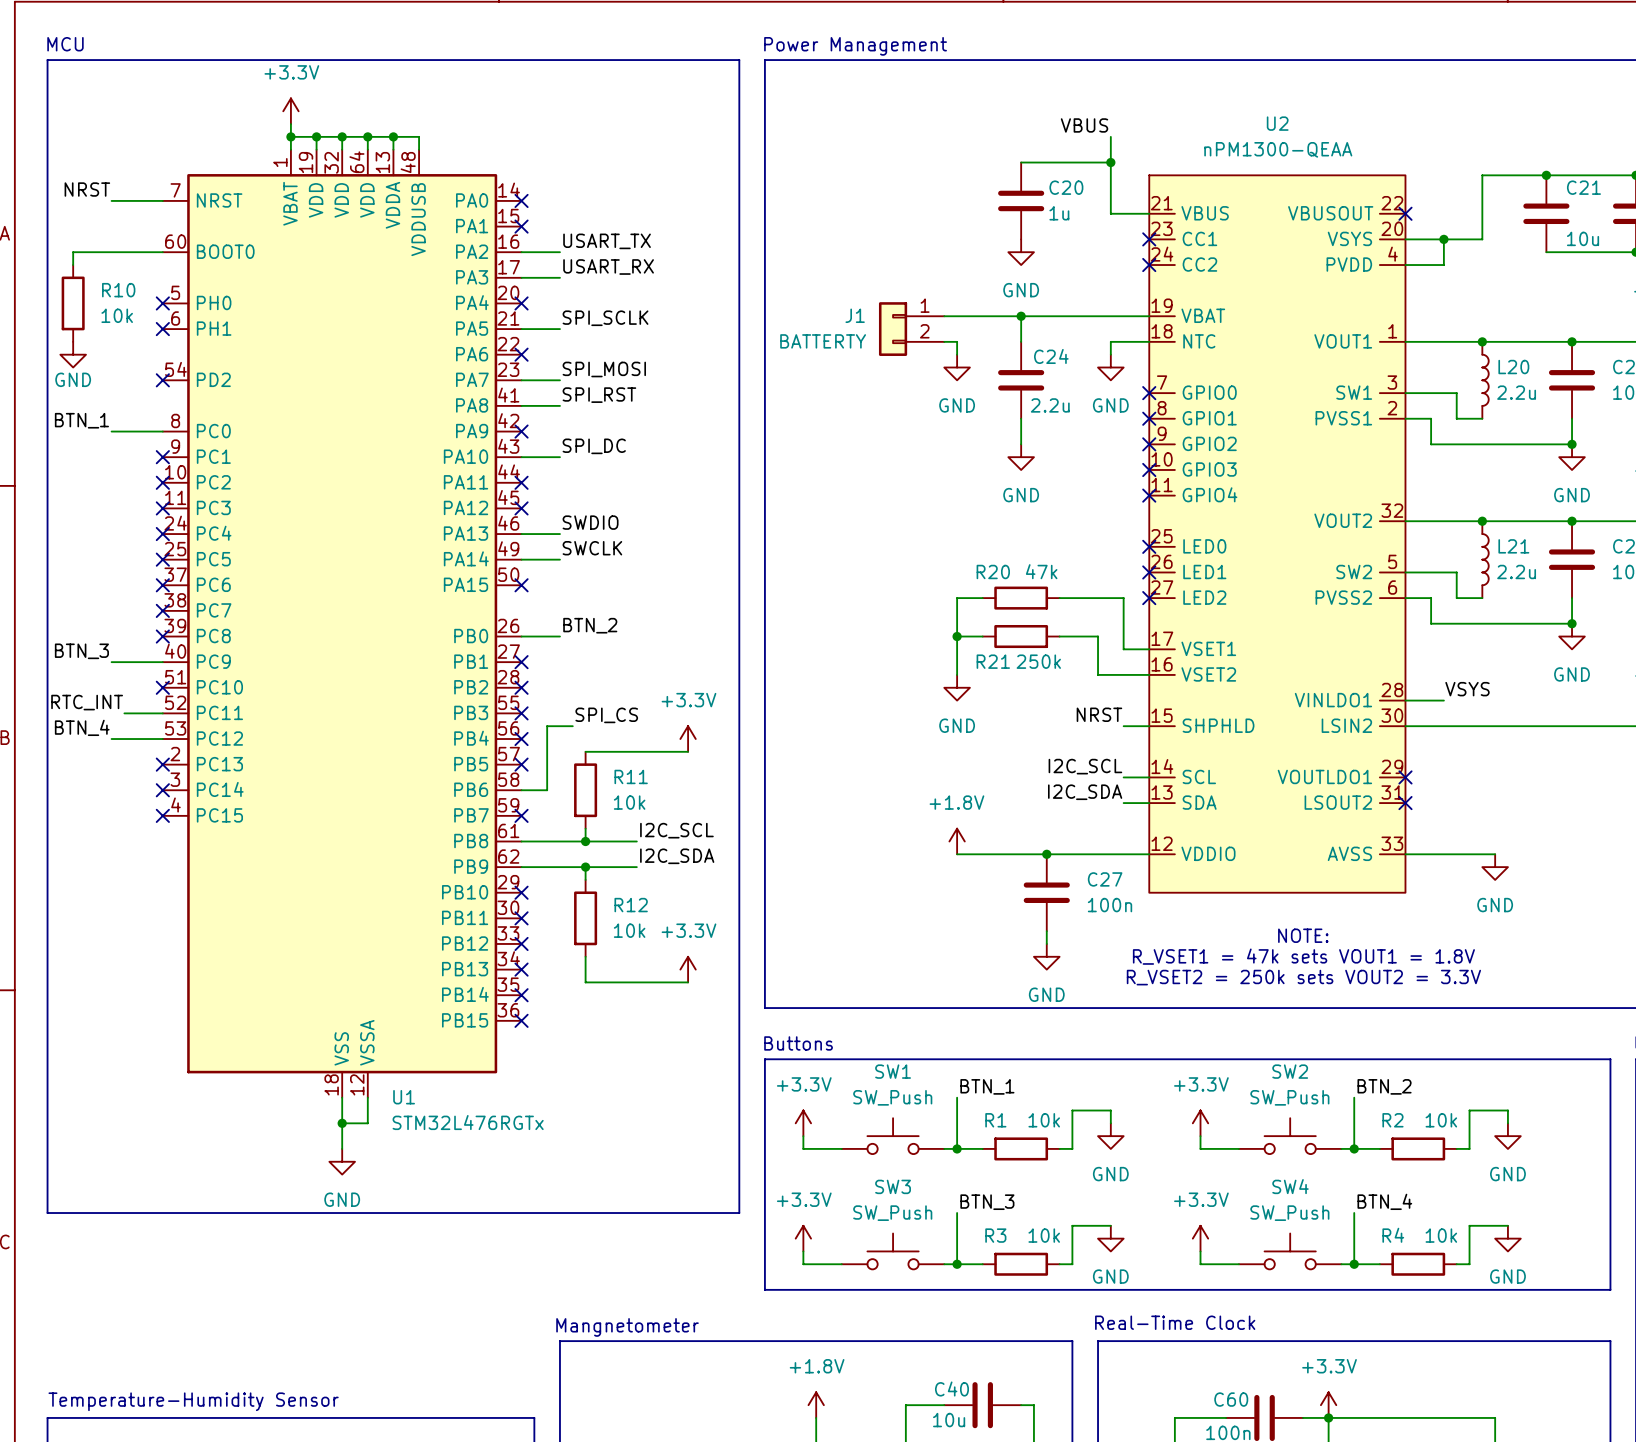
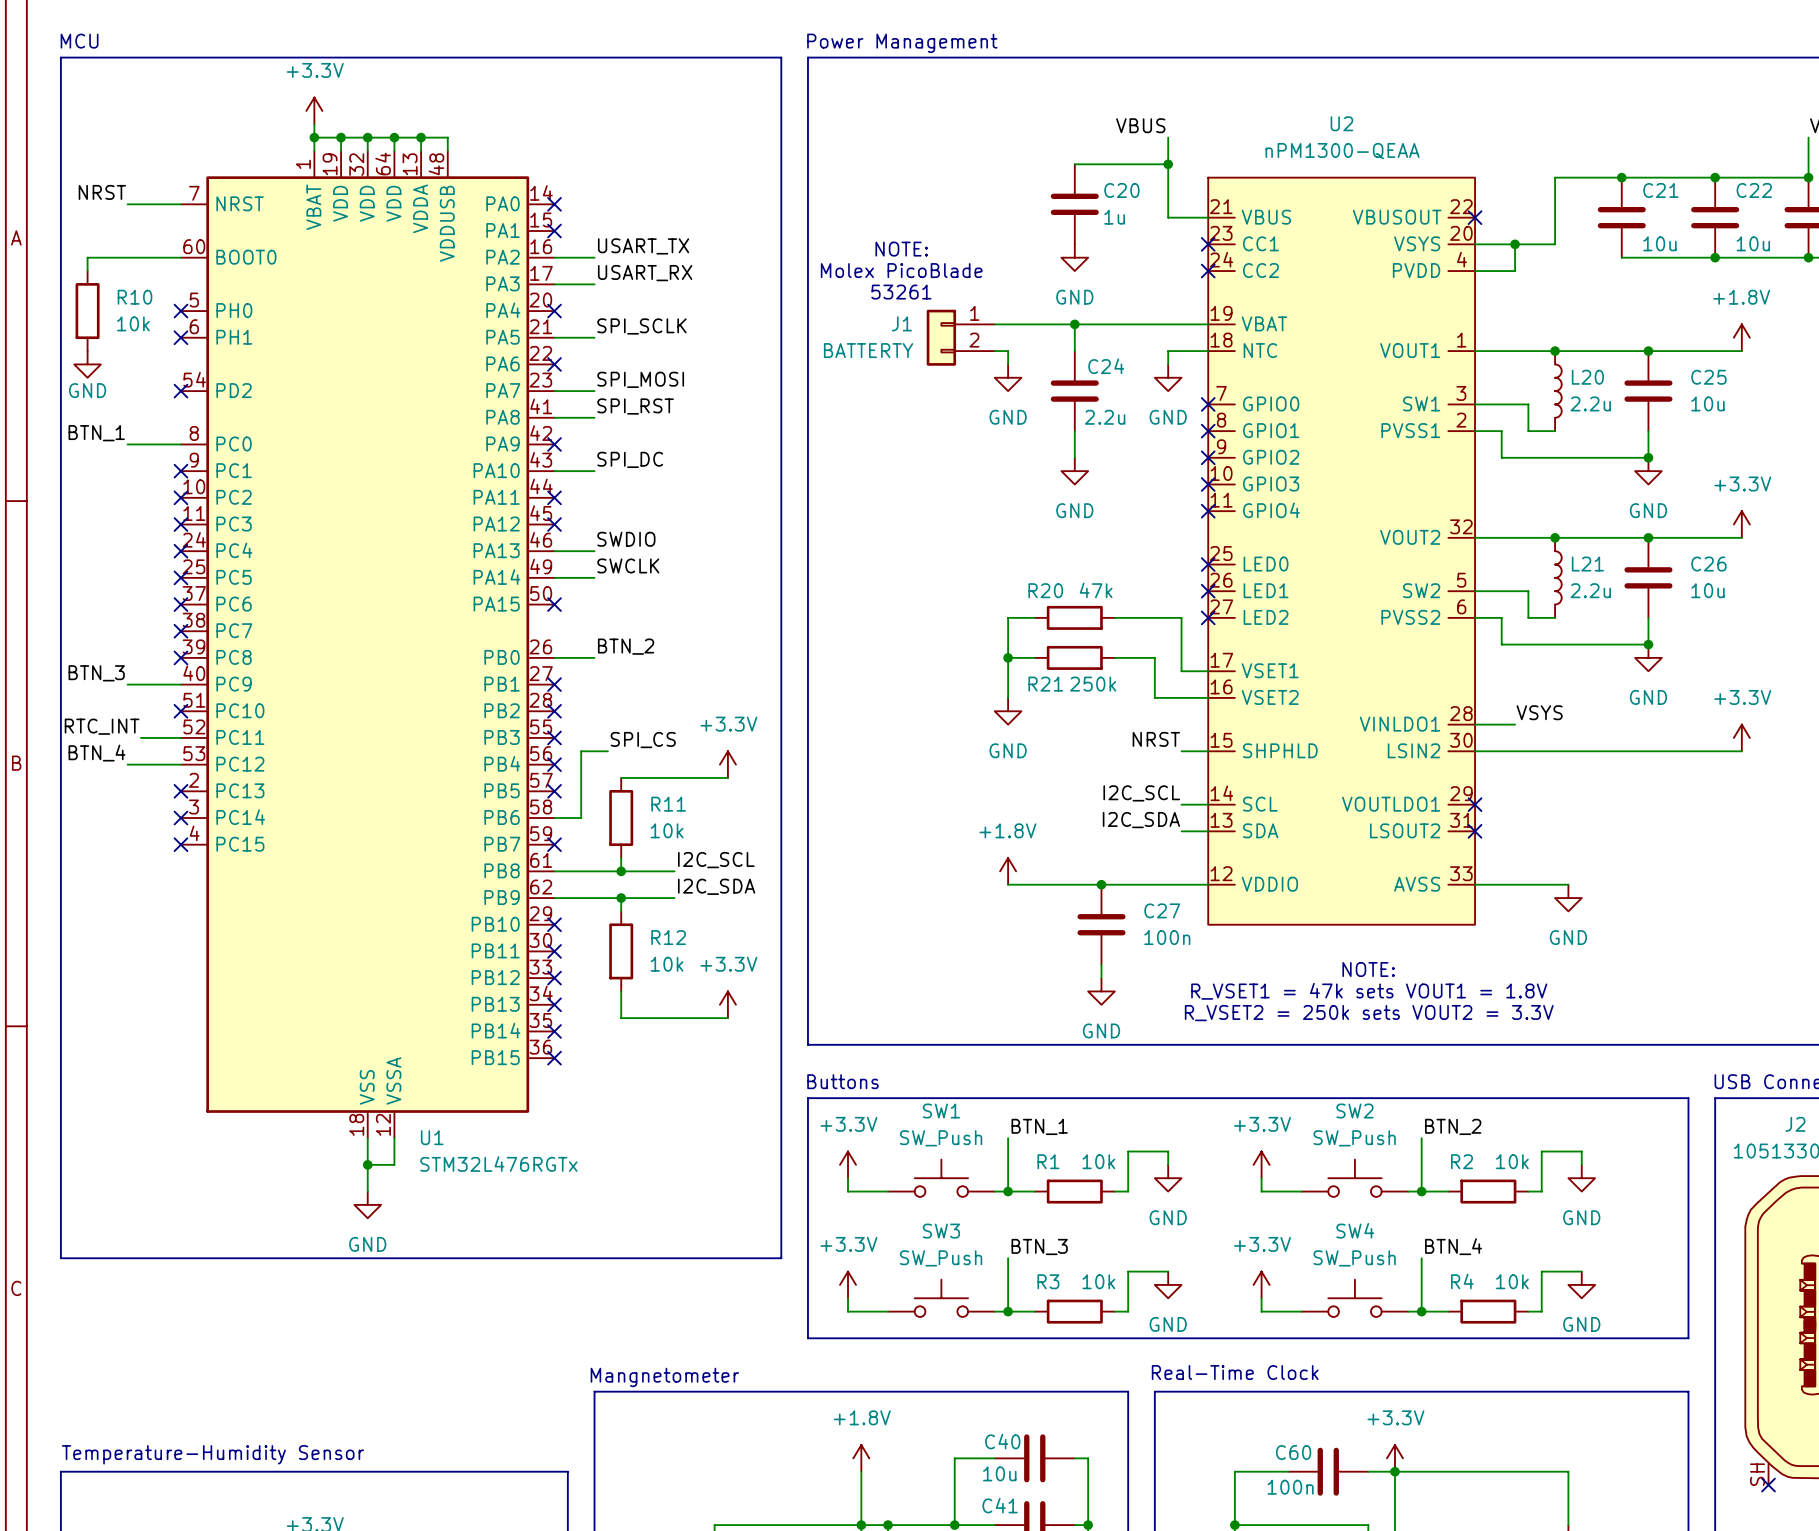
text: none -> NOTE: (901, 249)
text: none -> Molex PicoBlade (901, 270)
text: none -> 53261 (901, 292)

